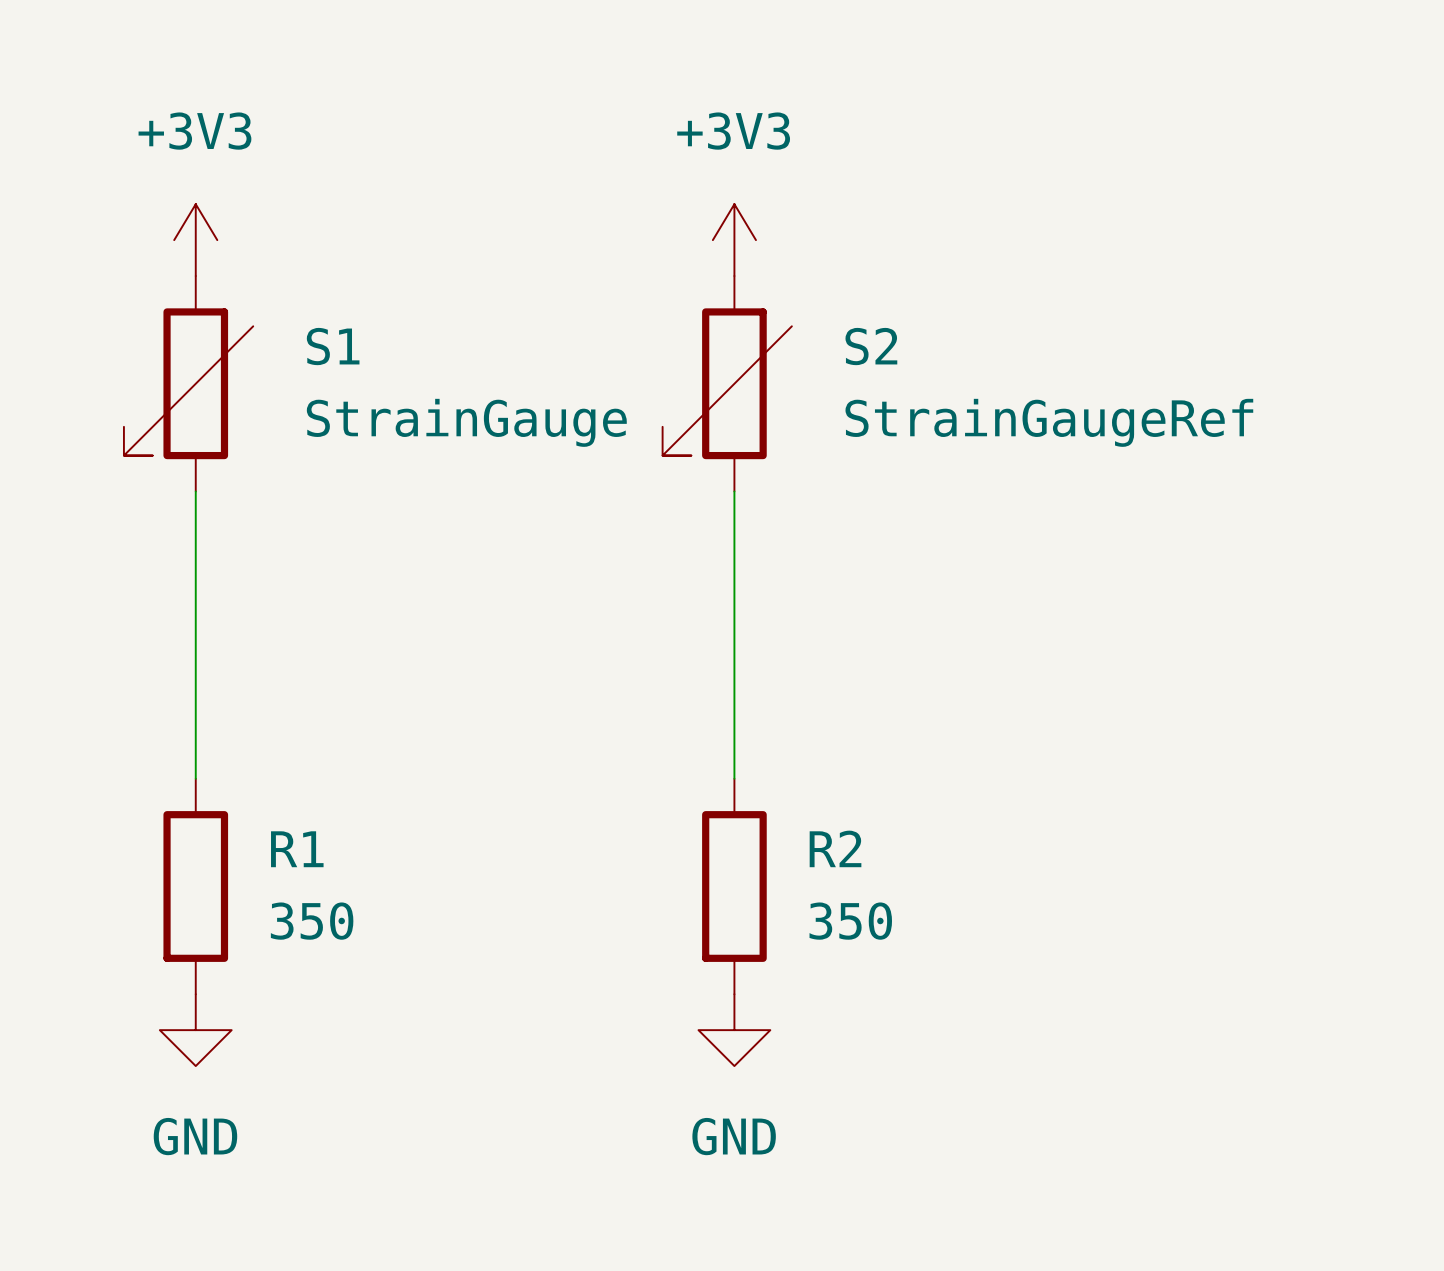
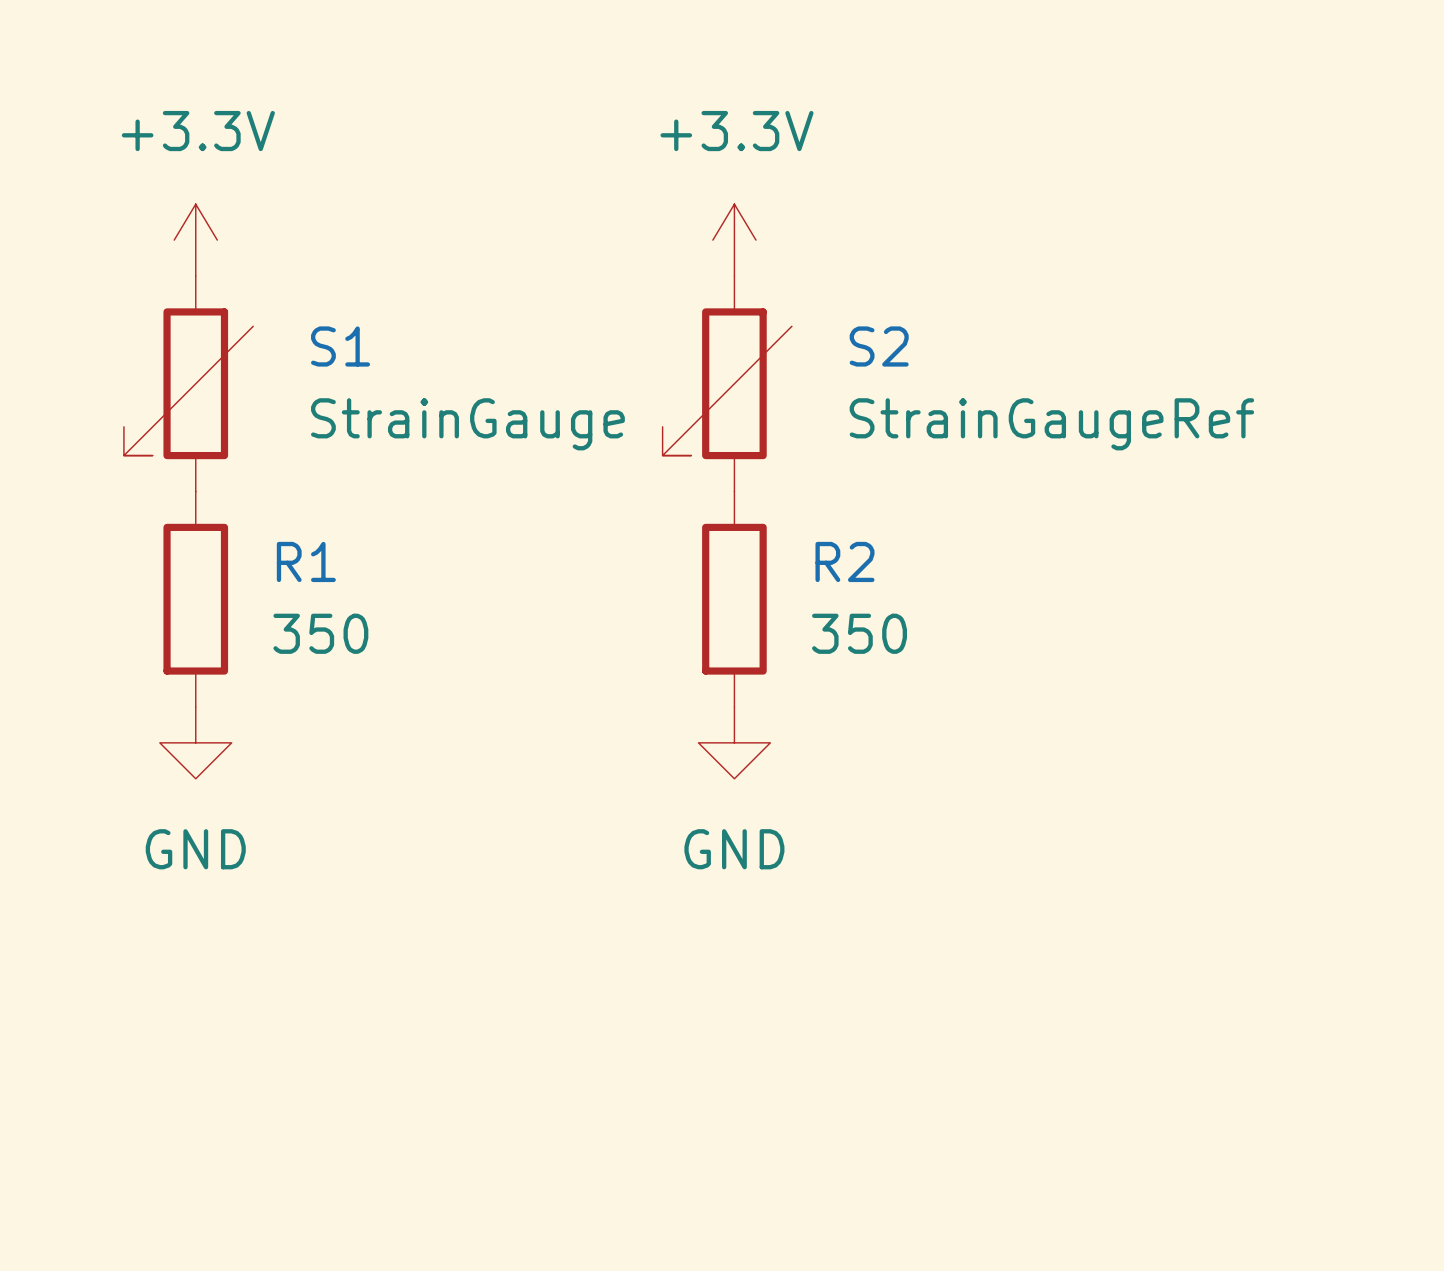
power symbol: +3V3 (195, 240) -> +3.3V (195, 240)
power symbol: +3V3 (734, 240) -> +3.3V (734, 240)
wire: (195, 491) (195, 778) -> none
wire: (734, 491) (734, 778) -> none
R1 position: (195, 886) -> (195, 599)
R2 position: (734, 886) -> (734, 599)
power symbol position: GND (195, 1030) -> GND (195, 742)
power symbol position: GND (734, 1030) -> GND (734, 742)

